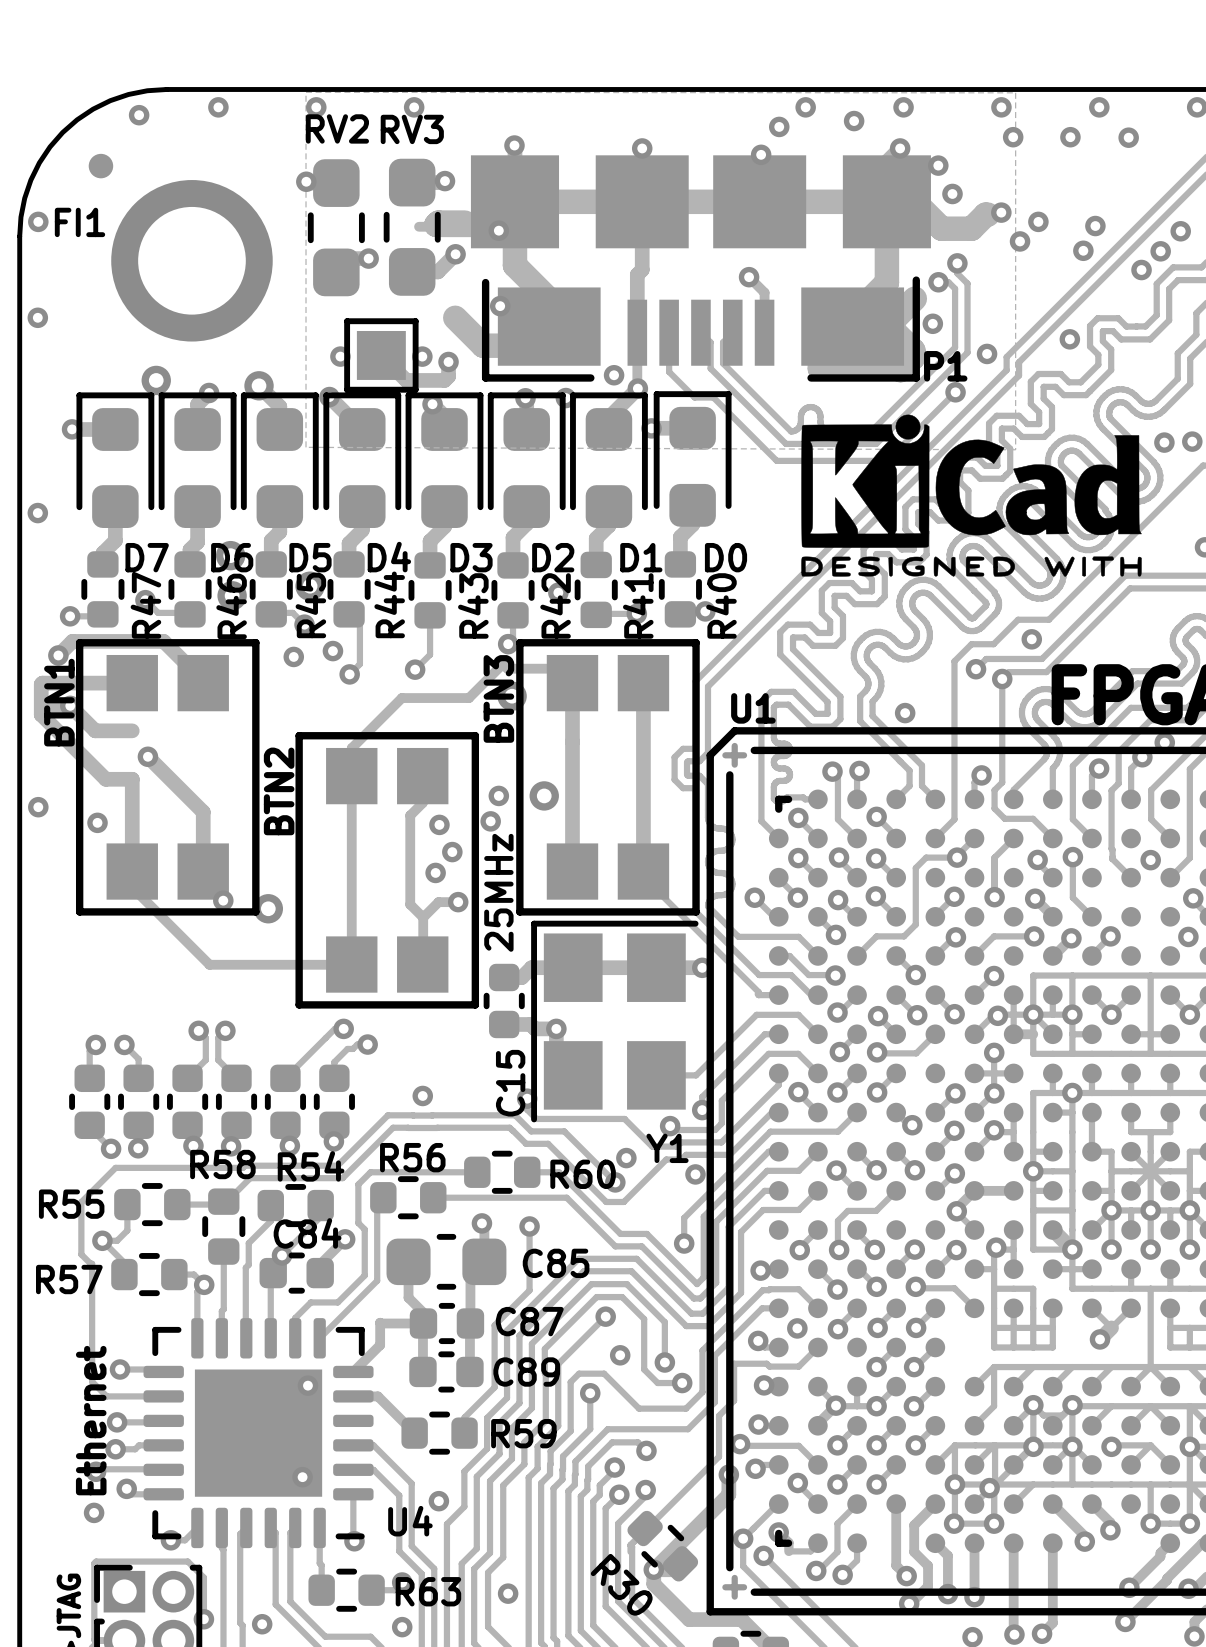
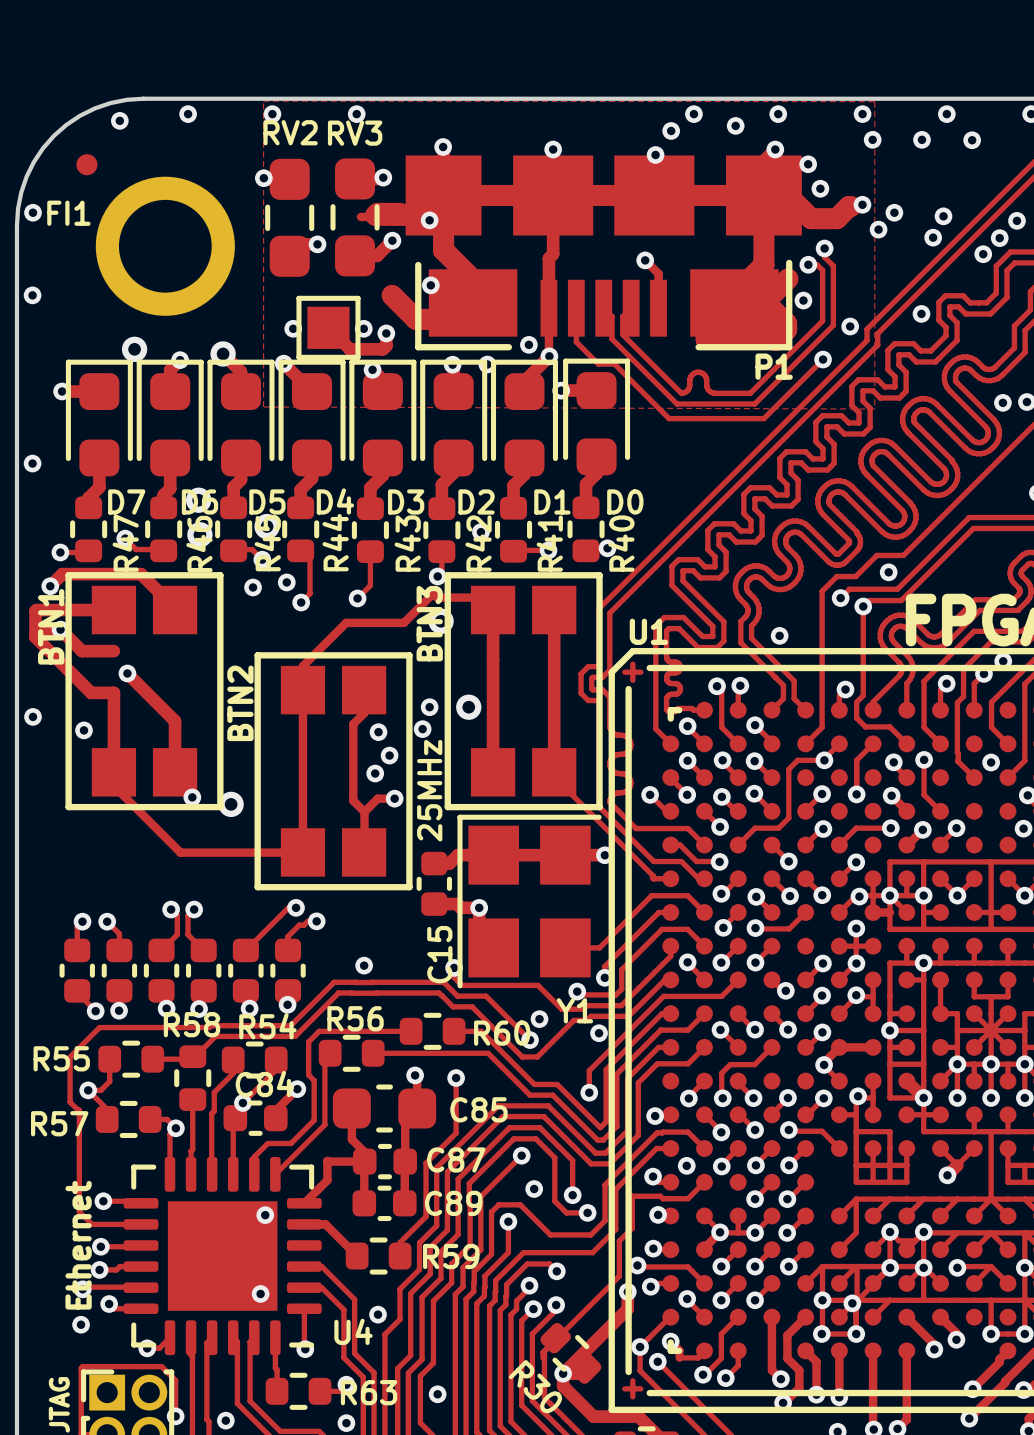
P1 name position: P1 (945, 366) -> P1 (774, 366)
drawing: [801, 414, 1142, 577] -> none

